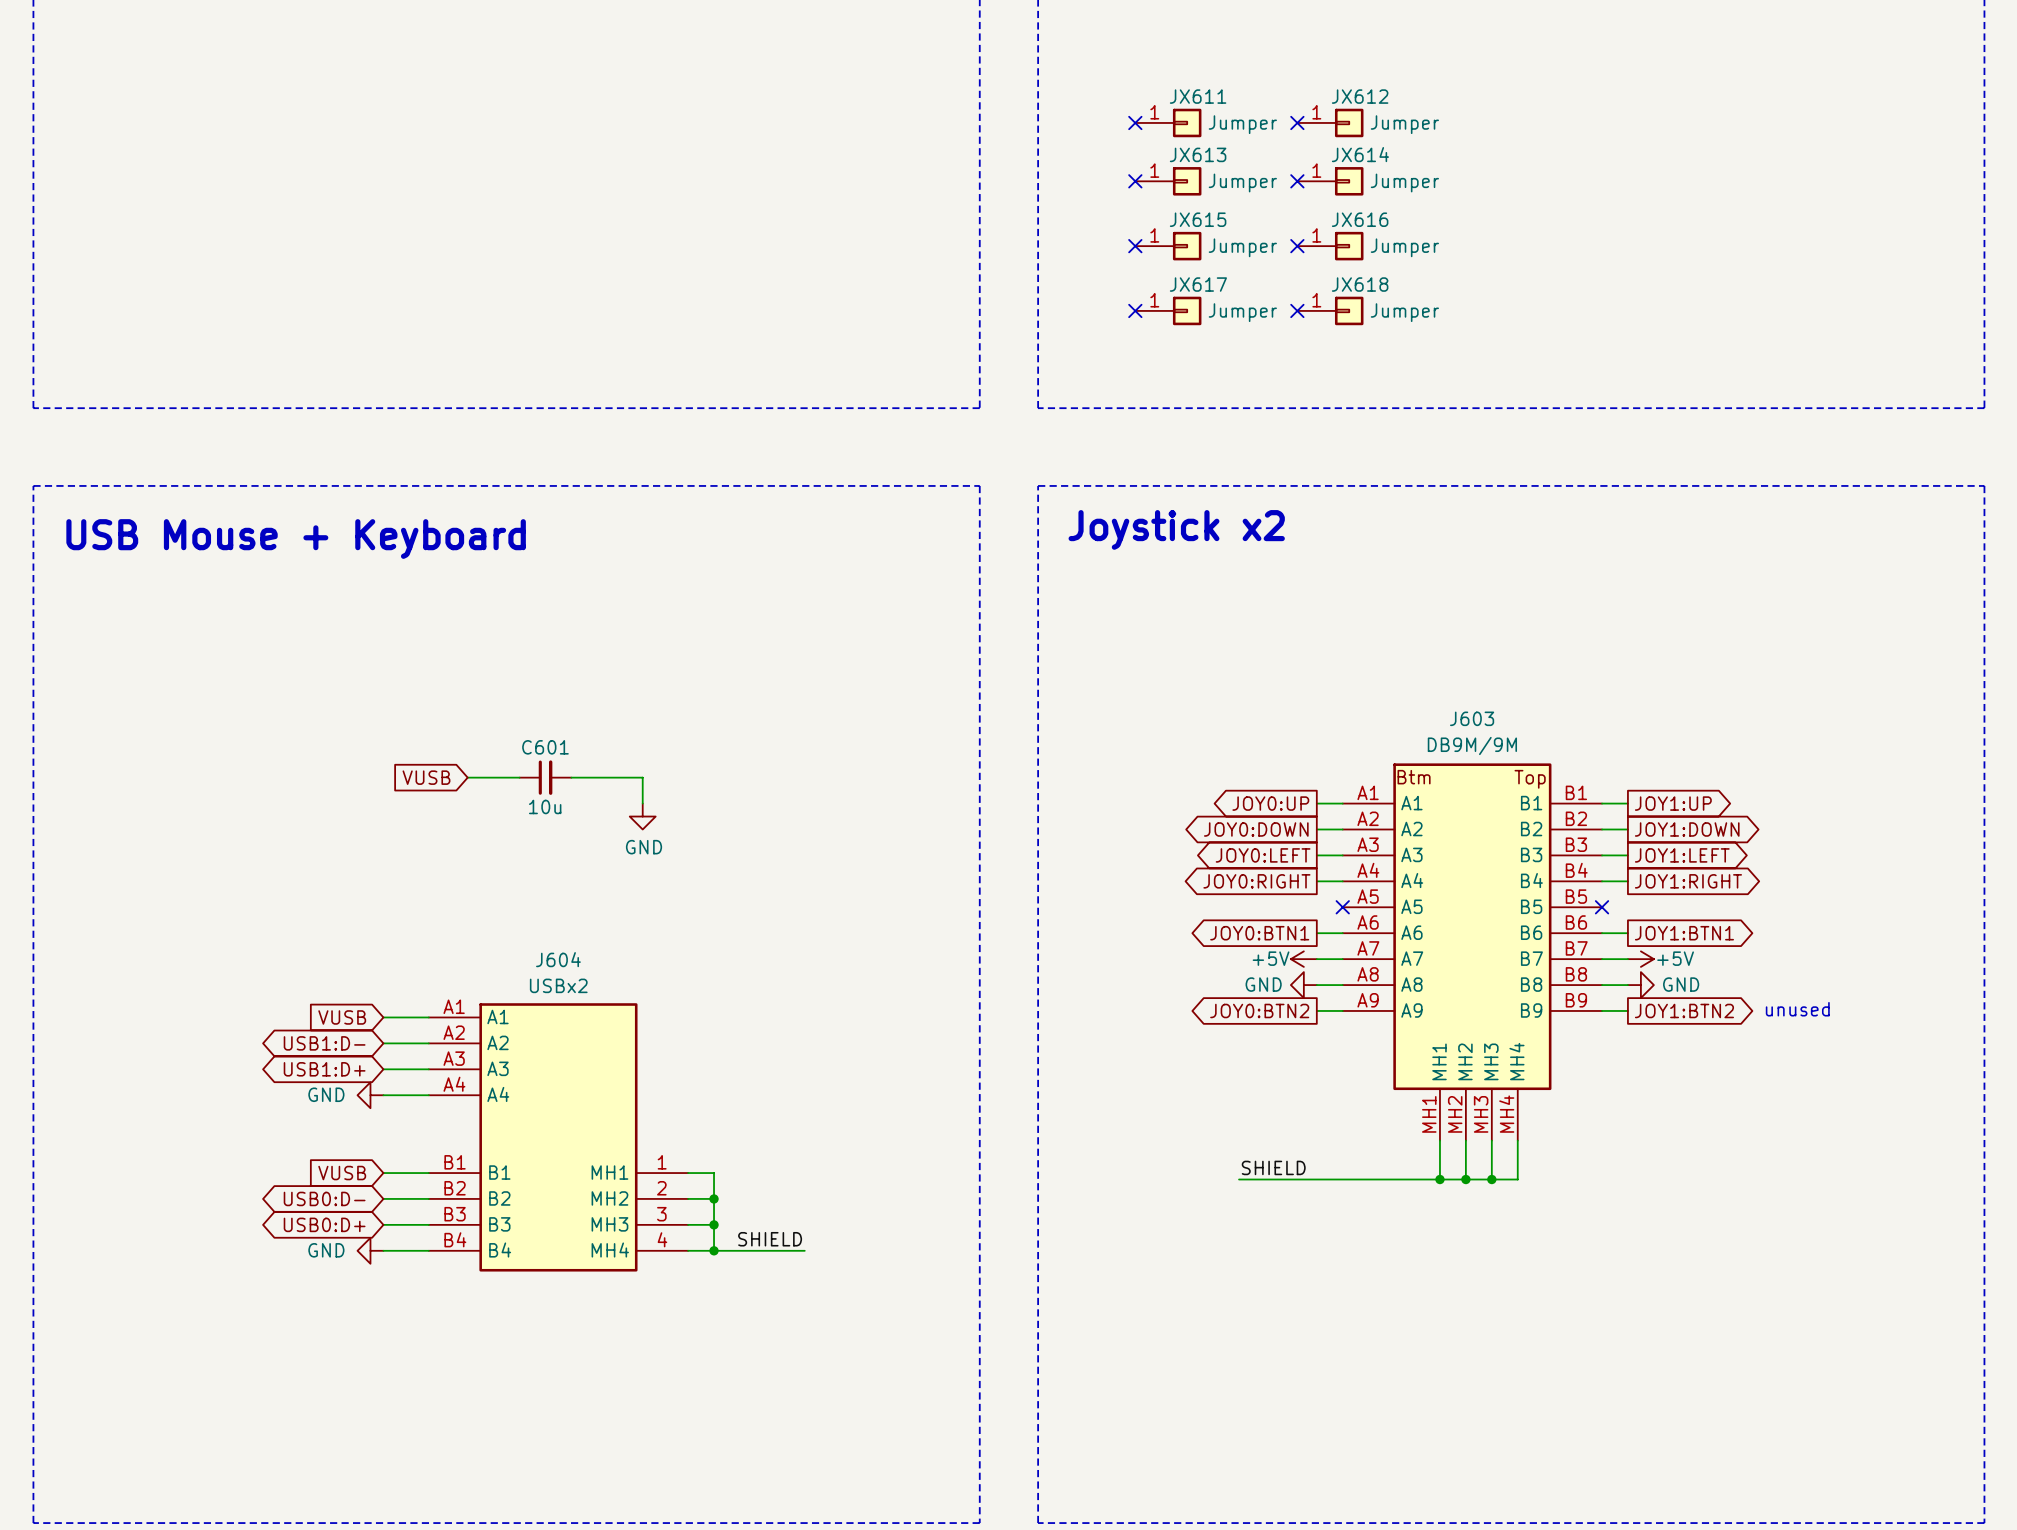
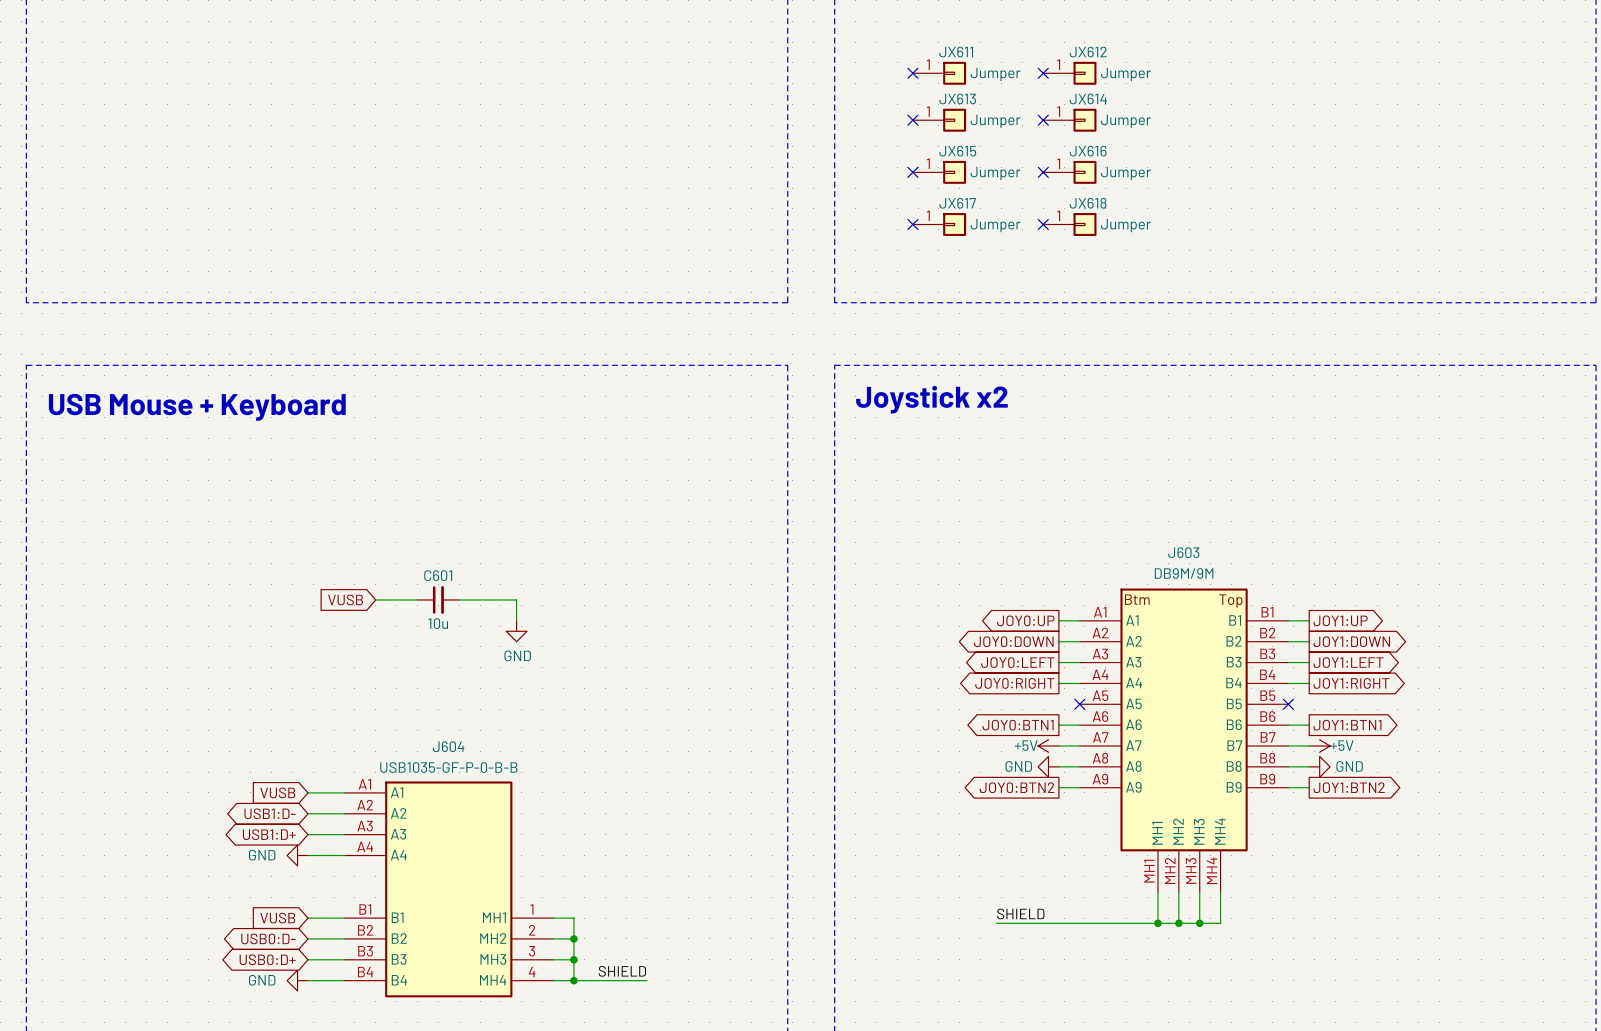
J604 value: USBx2 (558, 985) -> USB1035-GF-P-0-B-B (448, 767)
text: unused (1797, 1009) -> none

